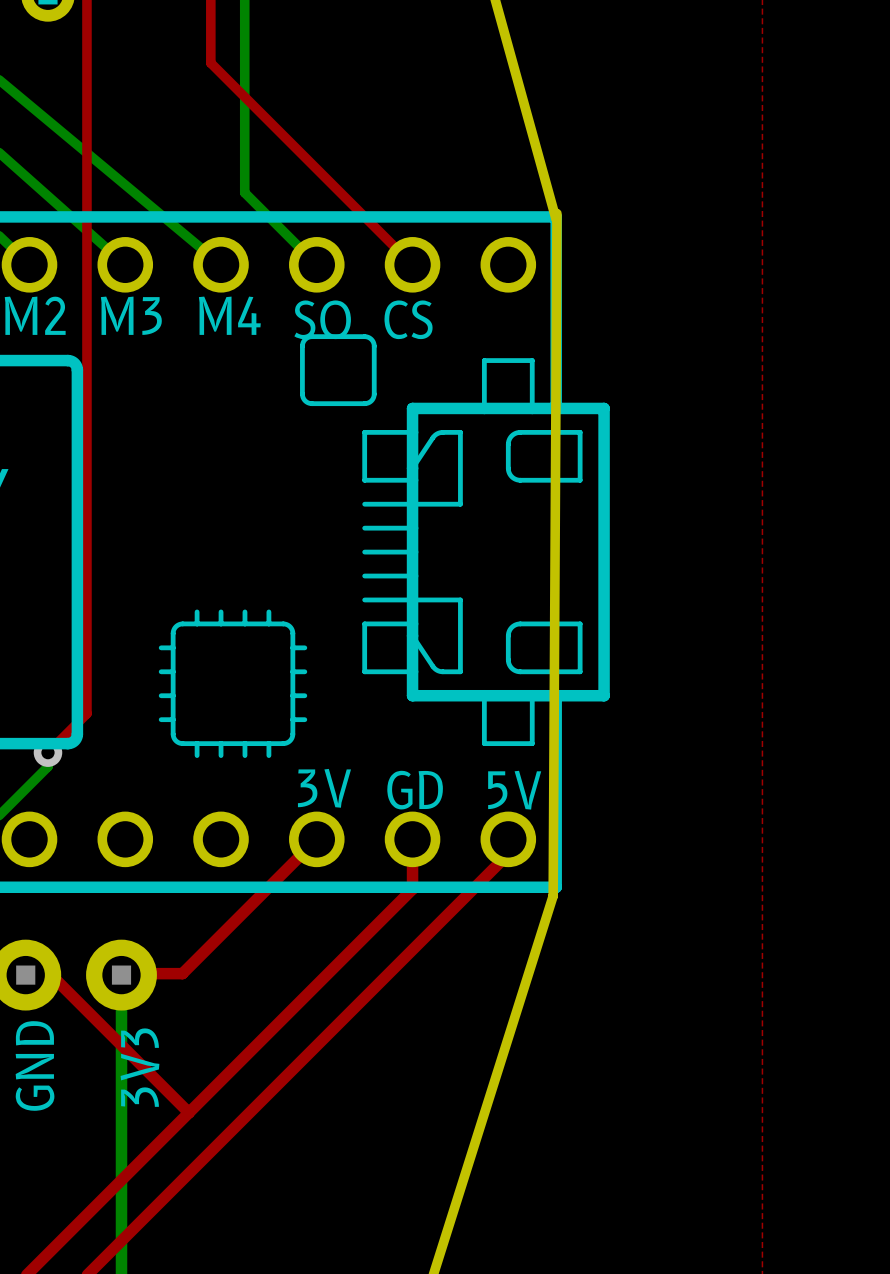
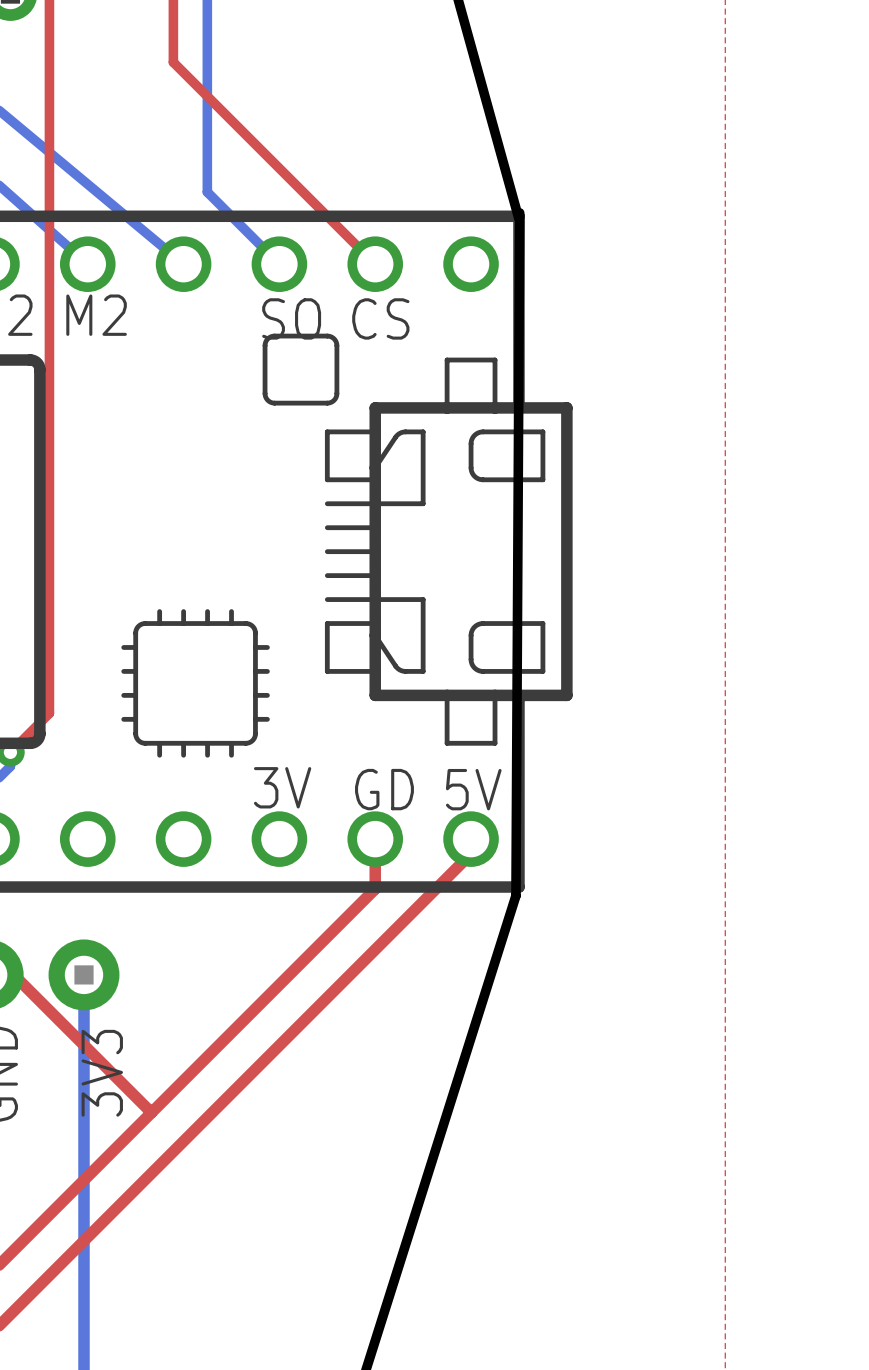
text: M3 (131, 315) -> M2 (96, 315)
text: M4 (229, 315) -> none
top track: (316, 839) (182, 973) (103, 973) -> none

